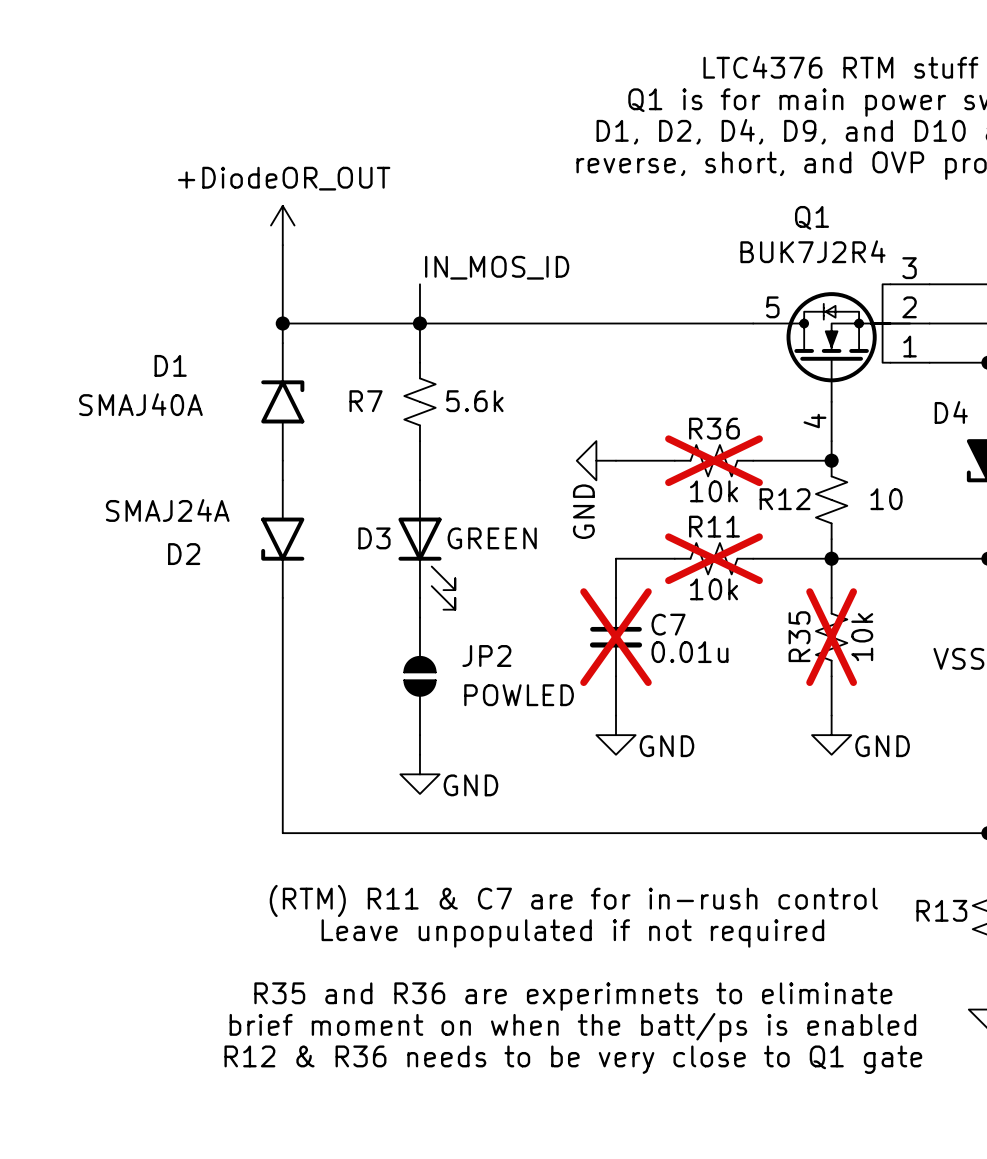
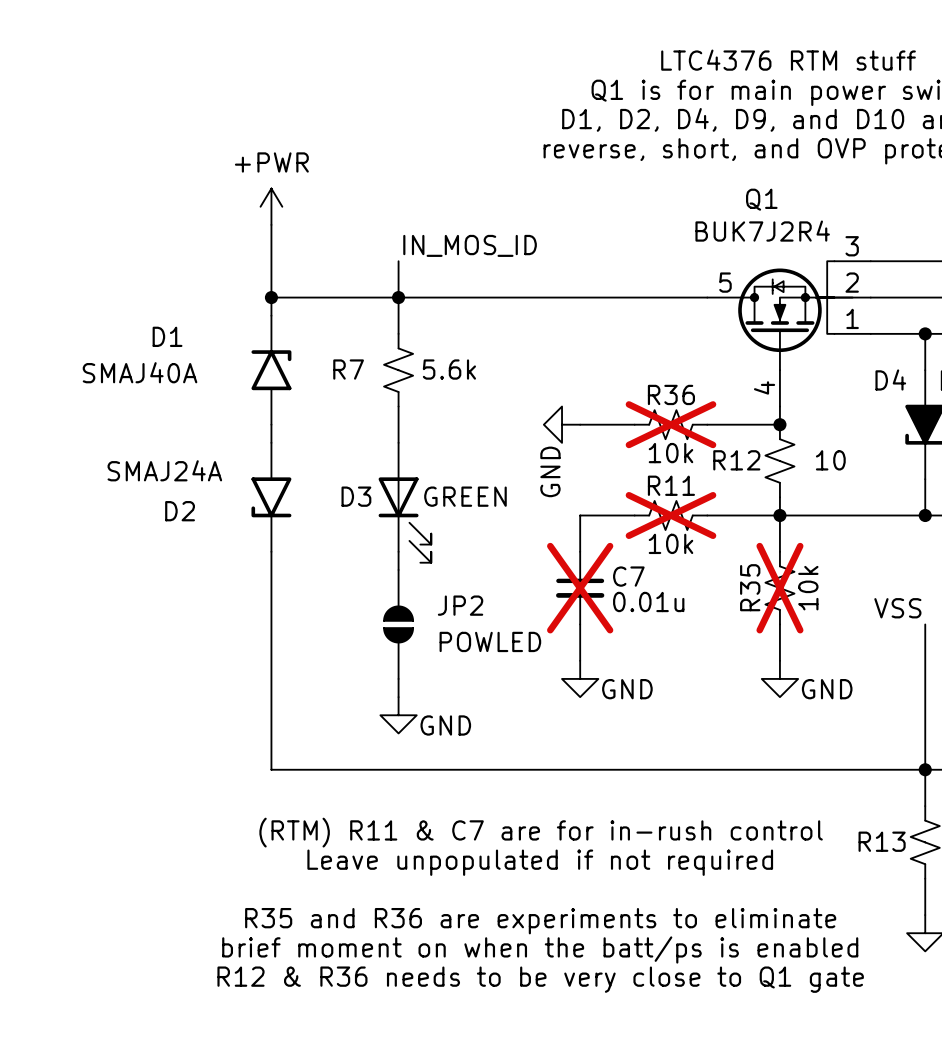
power symbol: +DiodeOR_OUT (282, 225) -> +PWR (271, 206)
text: R35 and R36 are experimnets to eliminate (573, 996) -> R35 and R36 are experiments to eliminate (540, 921)

